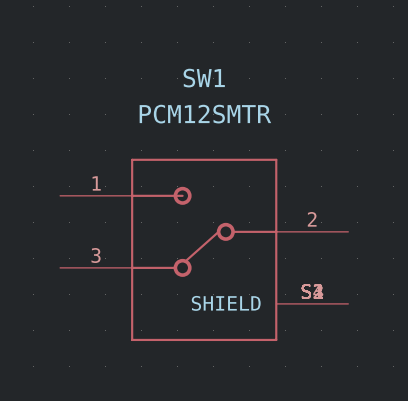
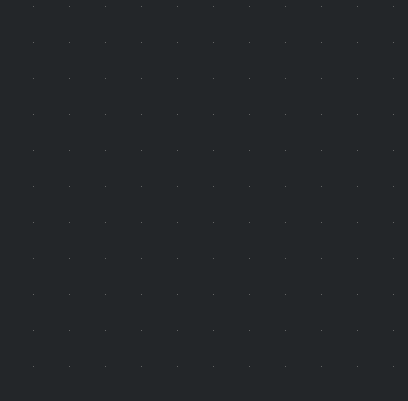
SW1: PCM12SMTR (204, 249) -> none

